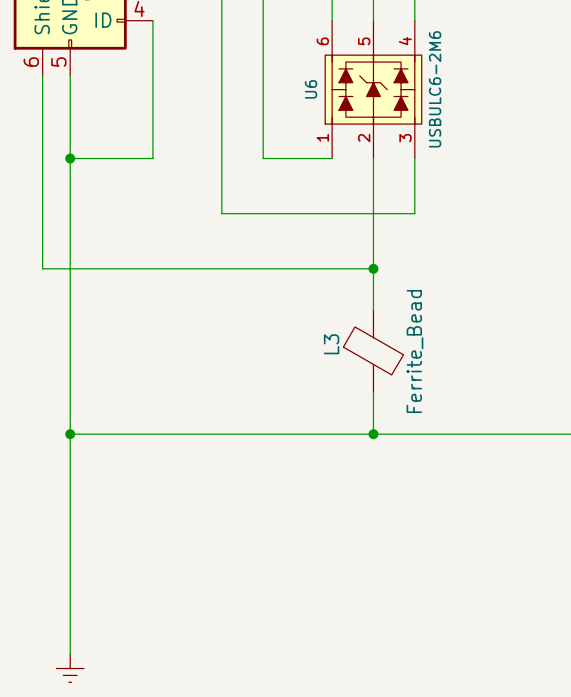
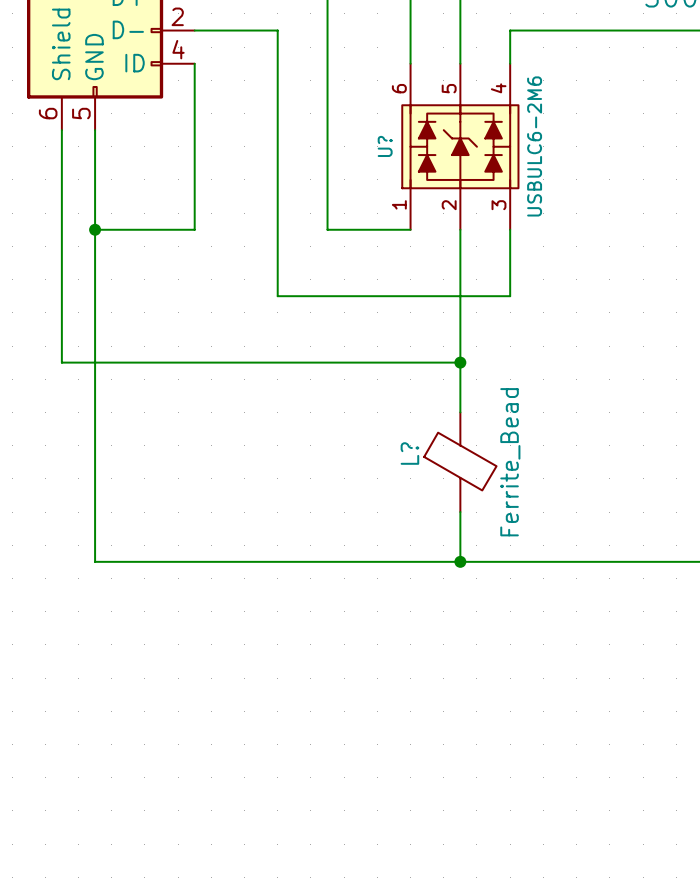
U6 name: U6 (311, 89) -> U? (385, 146)
L3 name: L3 (331, 344) -> L? (409, 453)
wire: (70, 434) (70, 654) -> none
junction: (70, 434) -> none
power symbol: (70, 668) -> none

